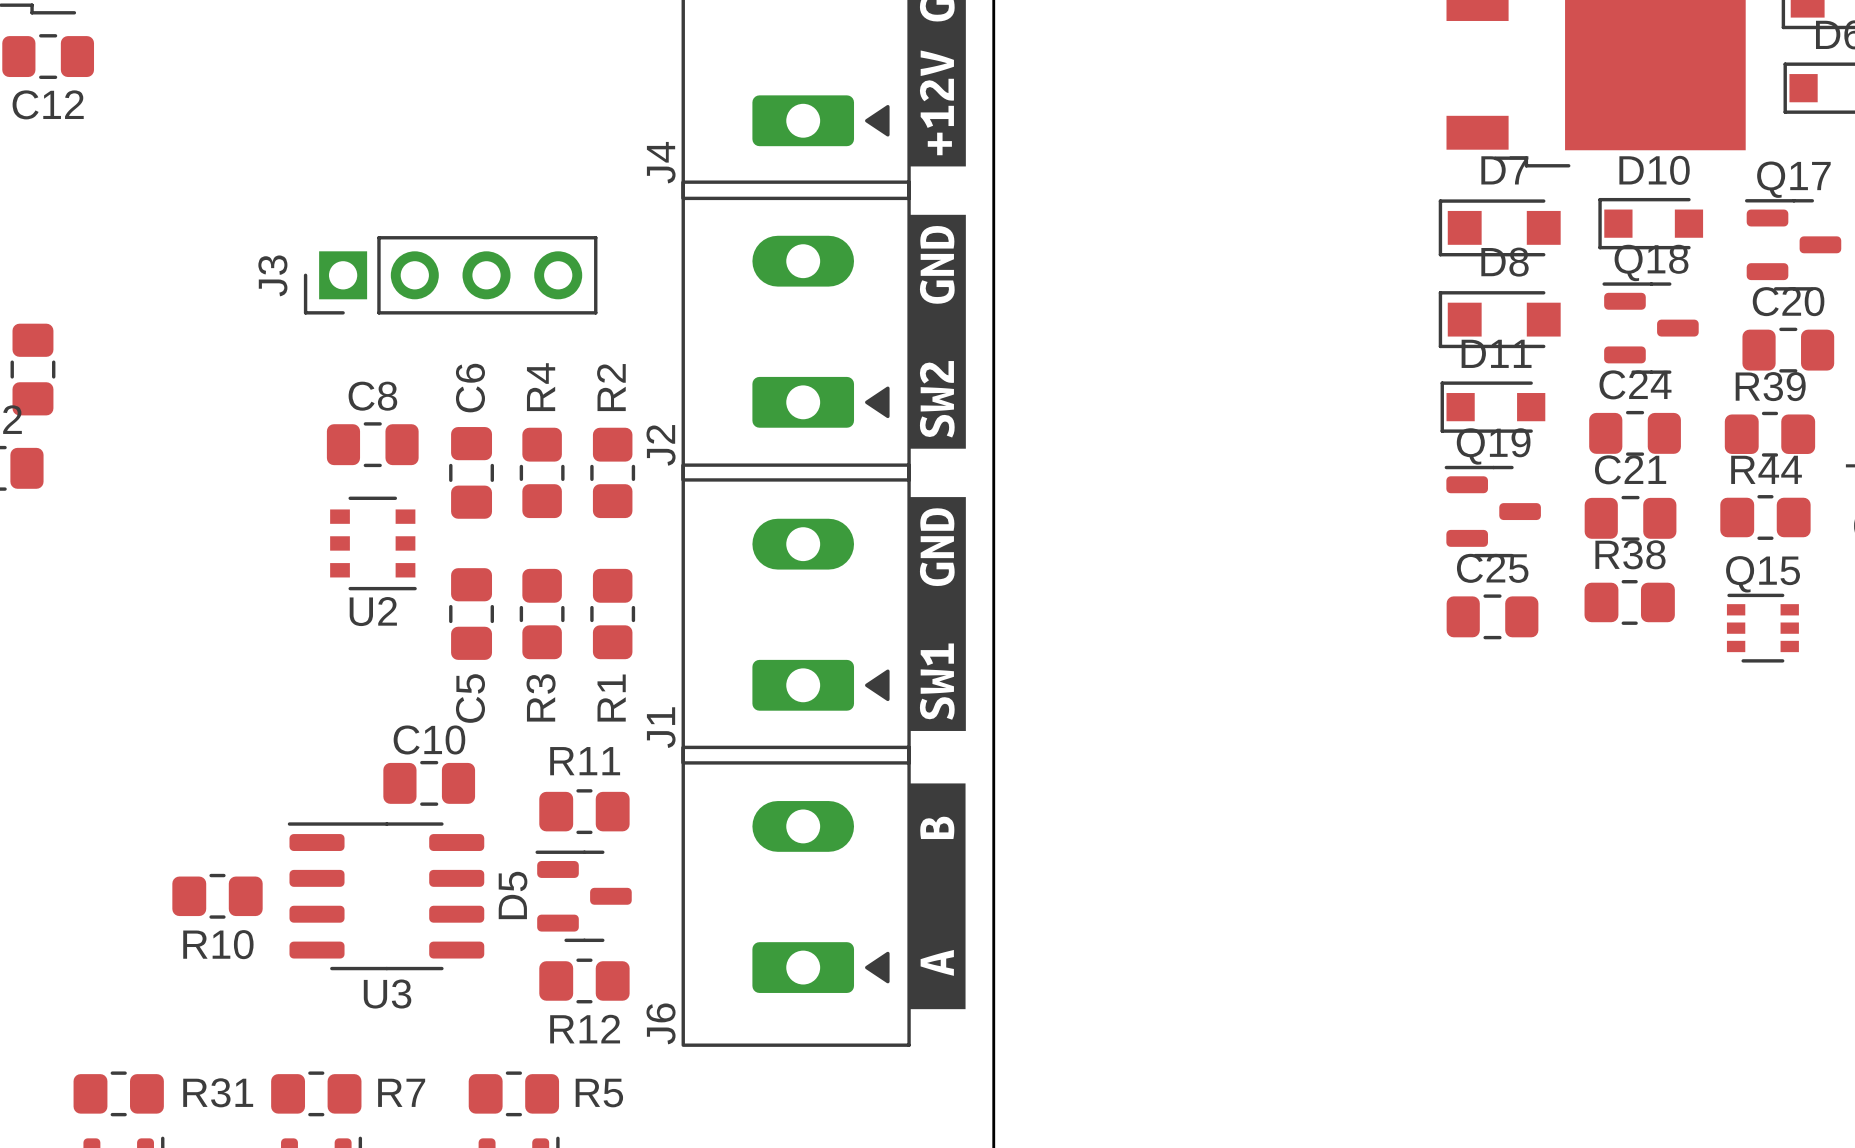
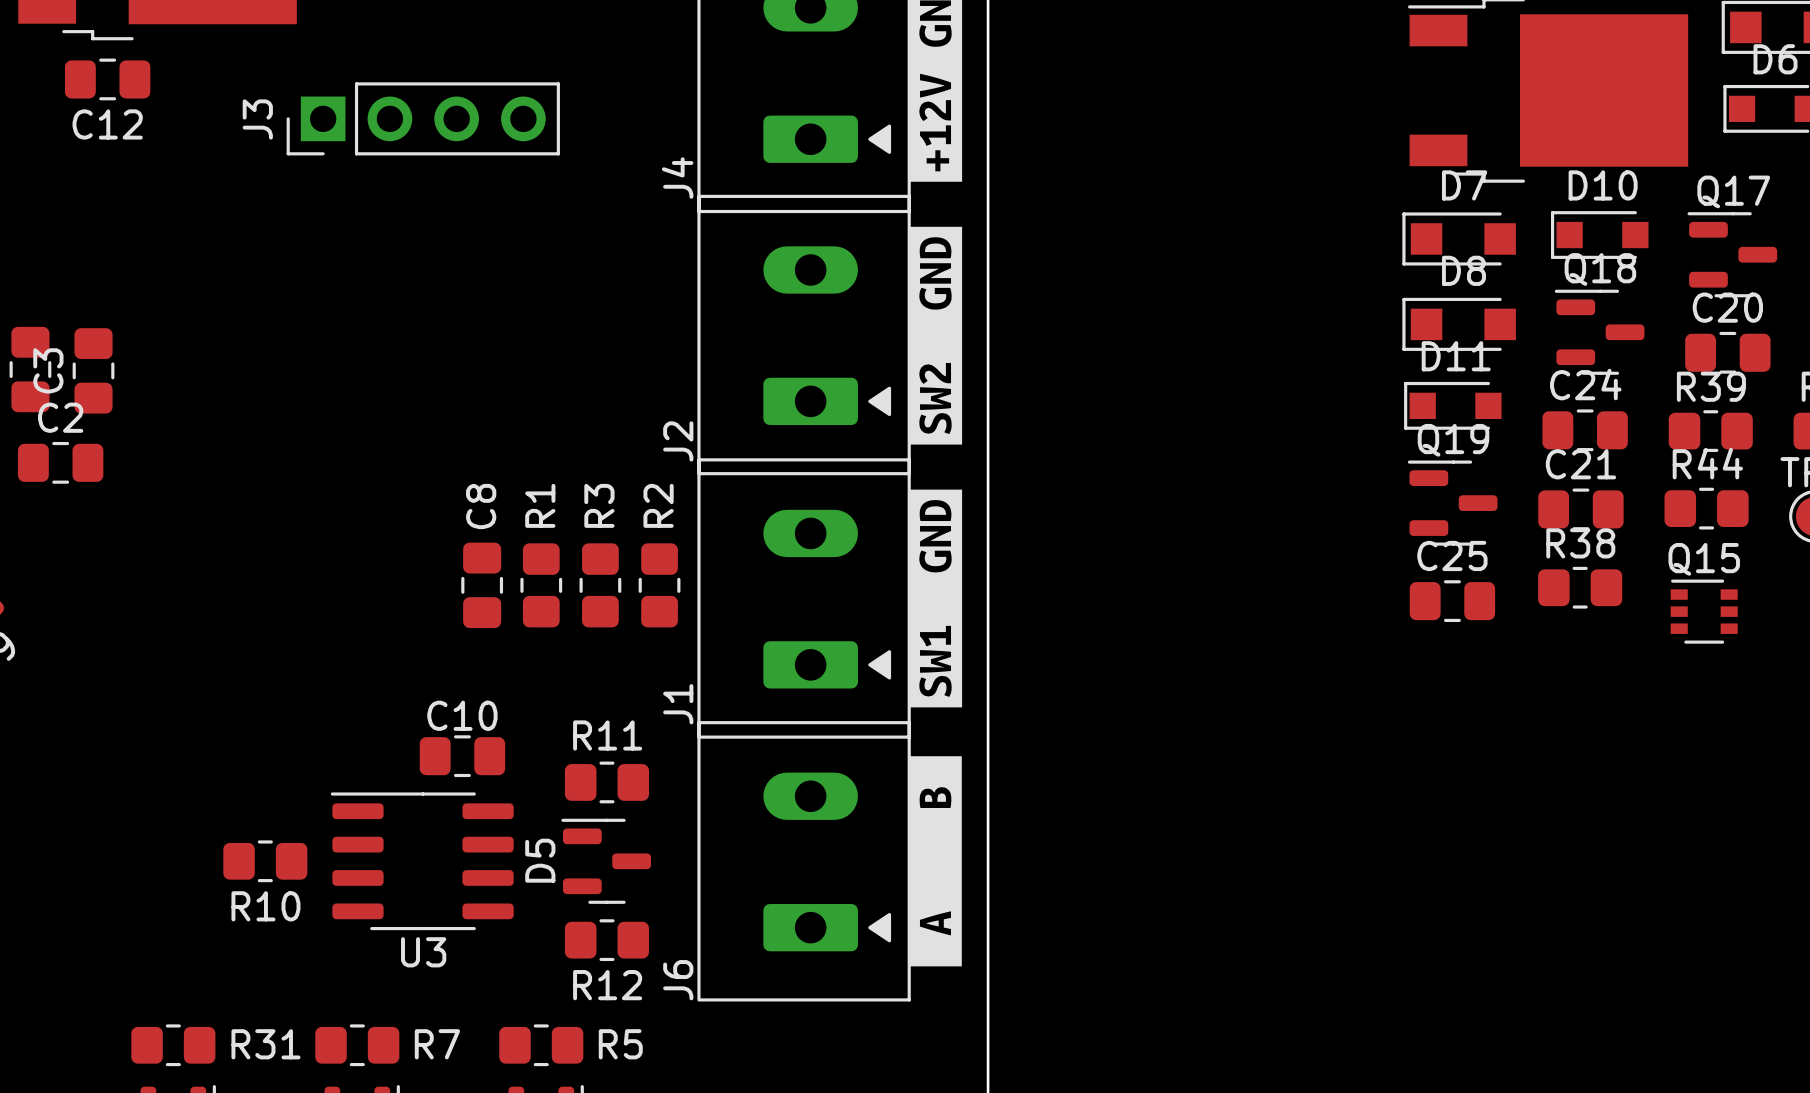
J3 position: (450, 275) -> (423, 118)
C8 rotation: 0° (372, 444) -> 90° clockwise (482, 585)
C8 position: (372, 444) -> (482, 585)
C6: (471, 472) -> none
R4: (542, 472) -> none
R2 position: (612, 472) -> (659, 585)
U2: (373, 543) -> none
C5: (471, 614) -> none
R3 position: (542, 614) -> (600, 585)
R1 position: (612, 614) -> (541, 585)
R3 name position: R3 (541, 697) -> R3 (599, 505)
R1 name position: R1 (611, 698) -> R1 (540, 505)

